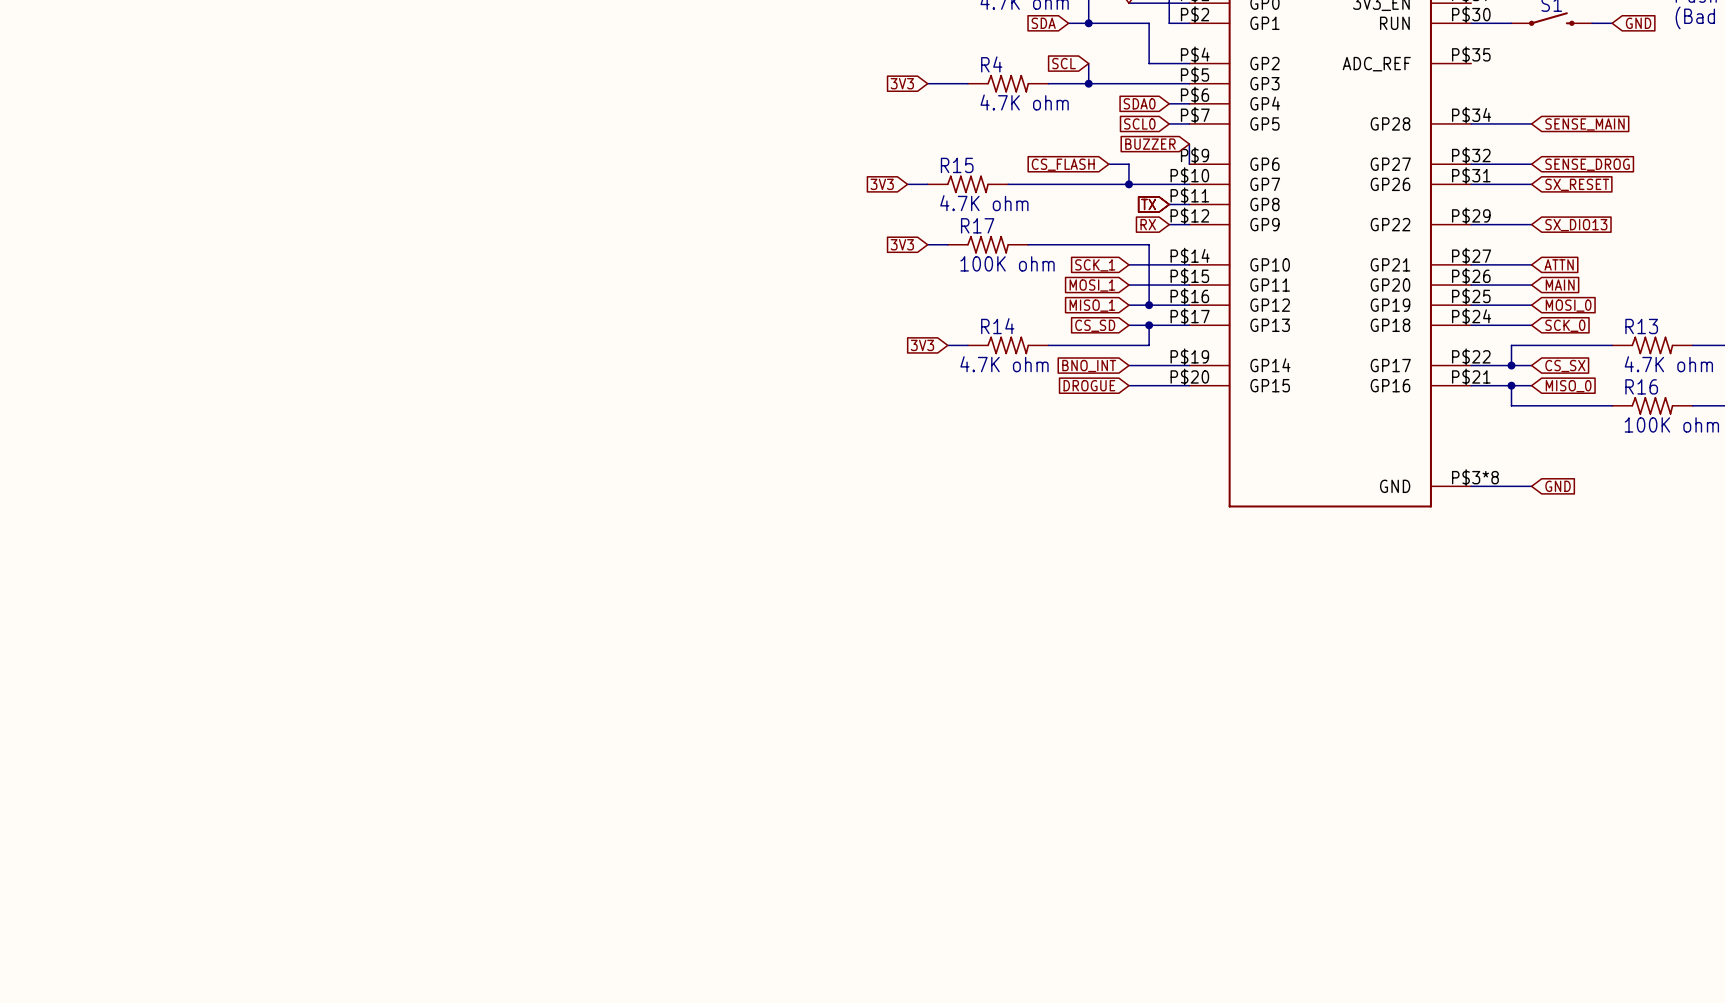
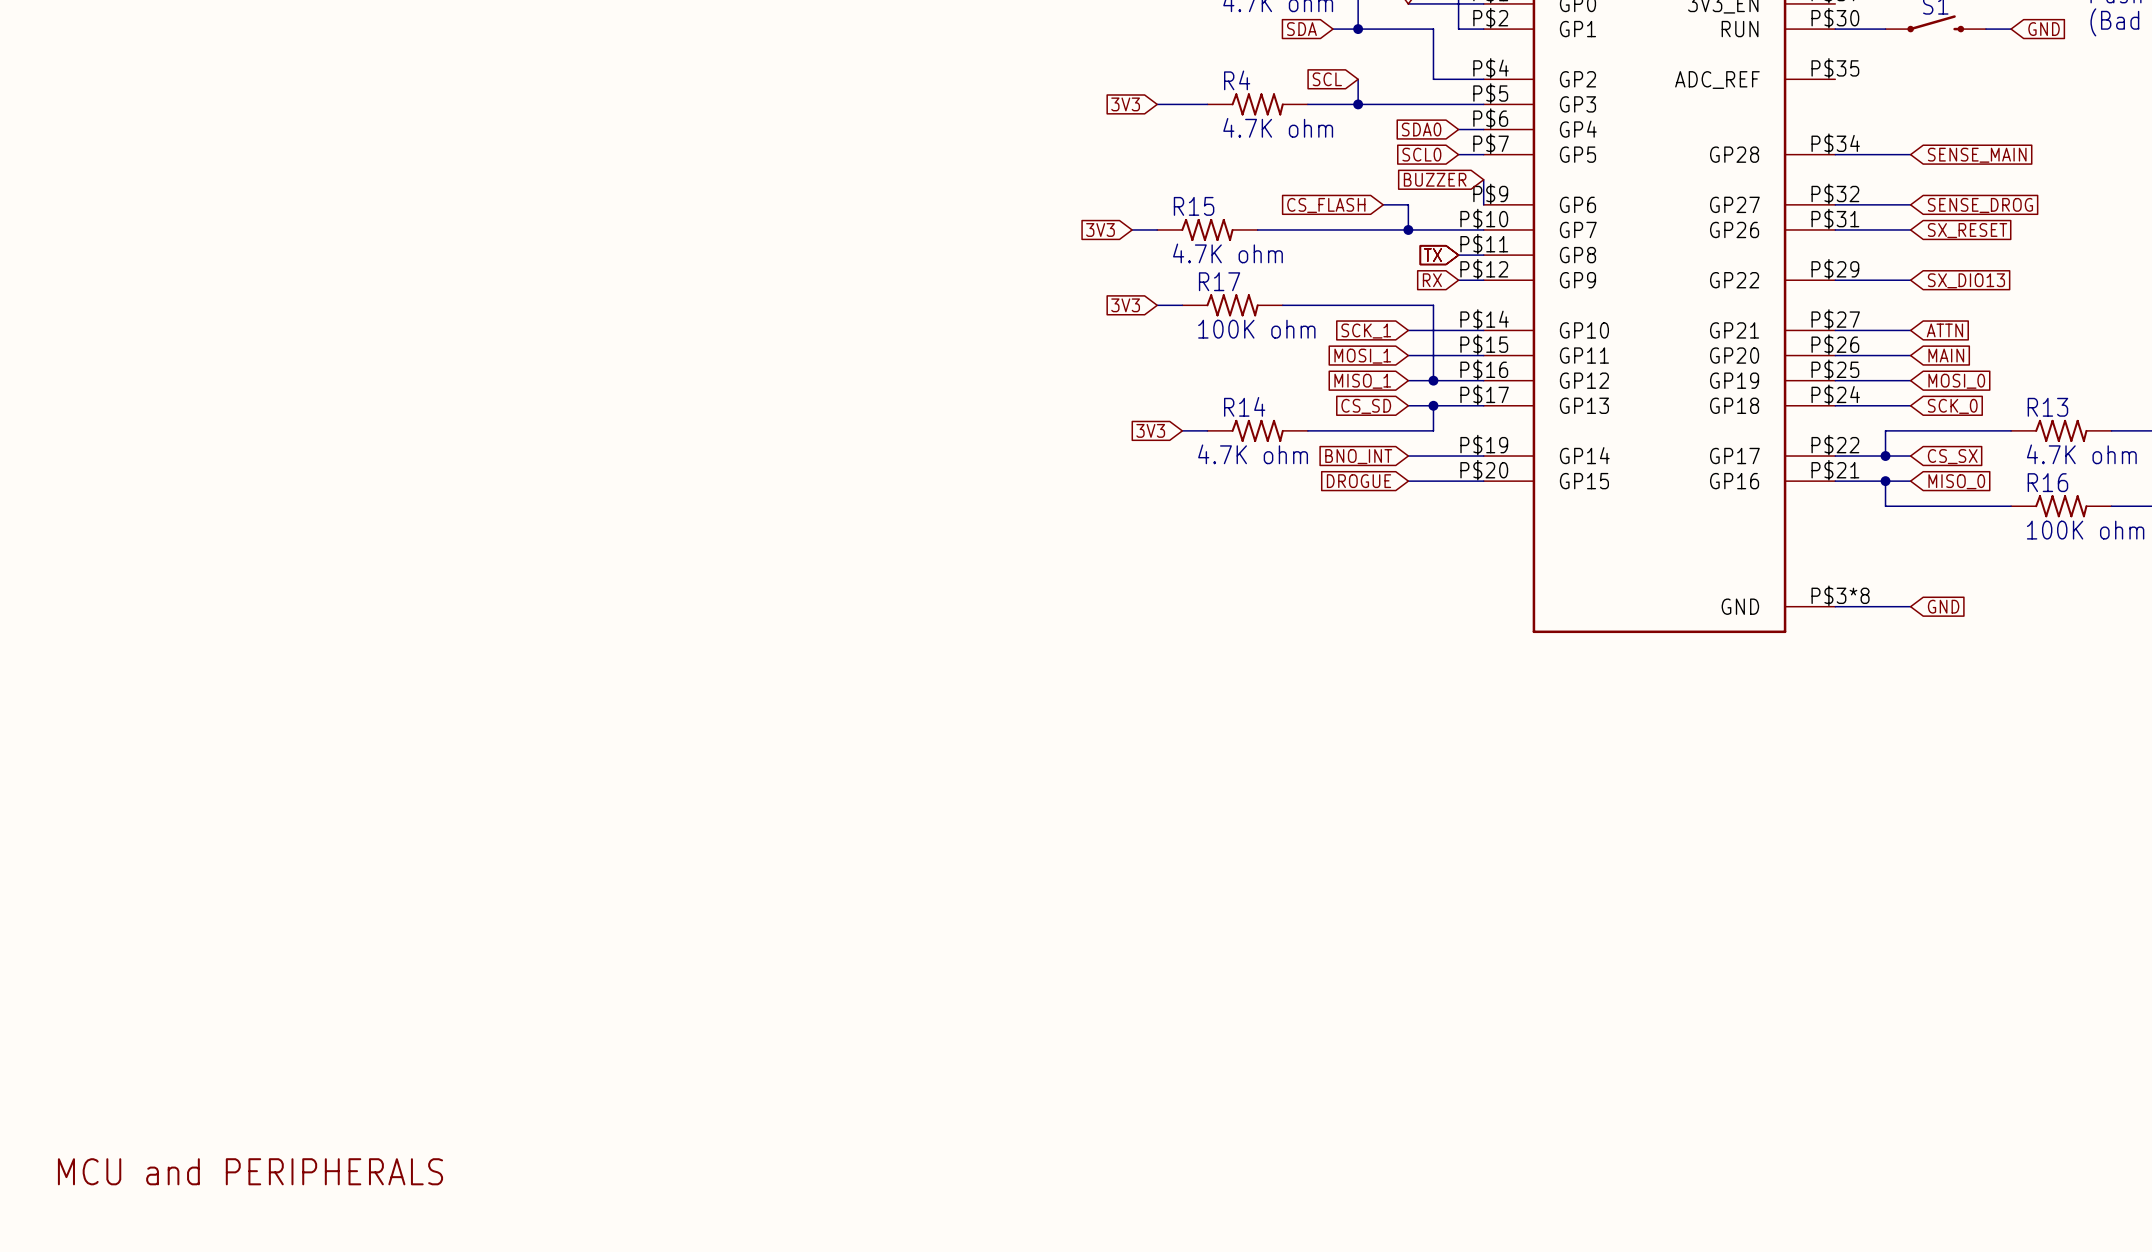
text: none -> MCU and PERIPHERALS (250, 1171)

